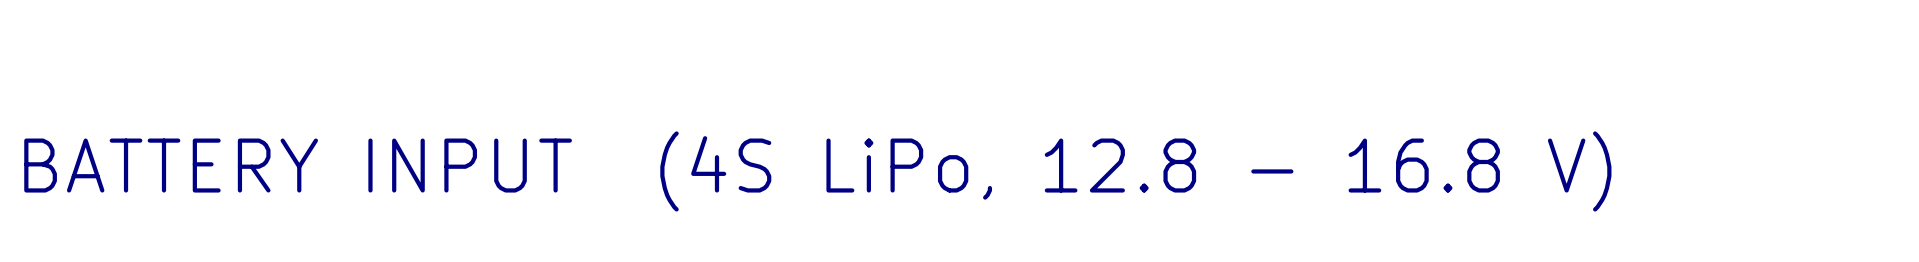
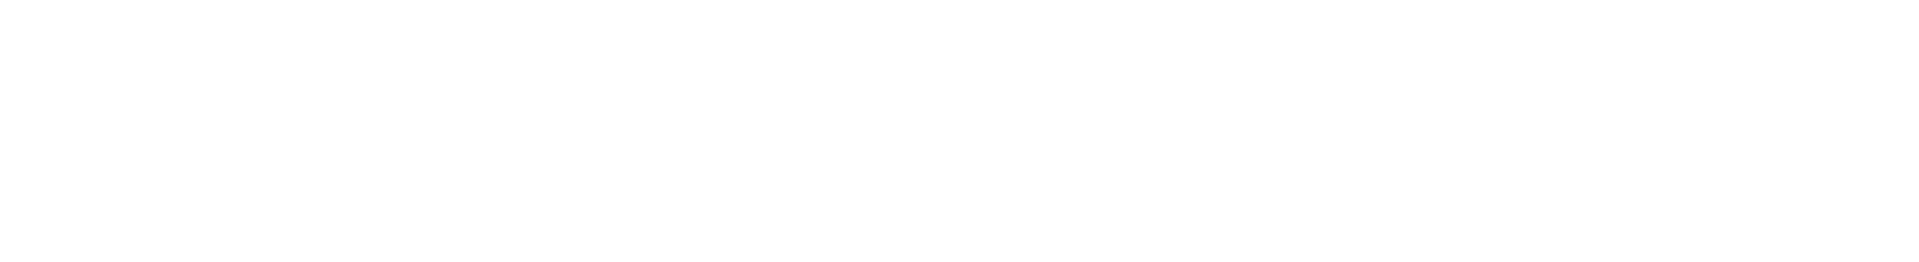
text: BATTERY INPUT (4S LiPo, 12.8 - 16.8 V) (817, 171) -> none

